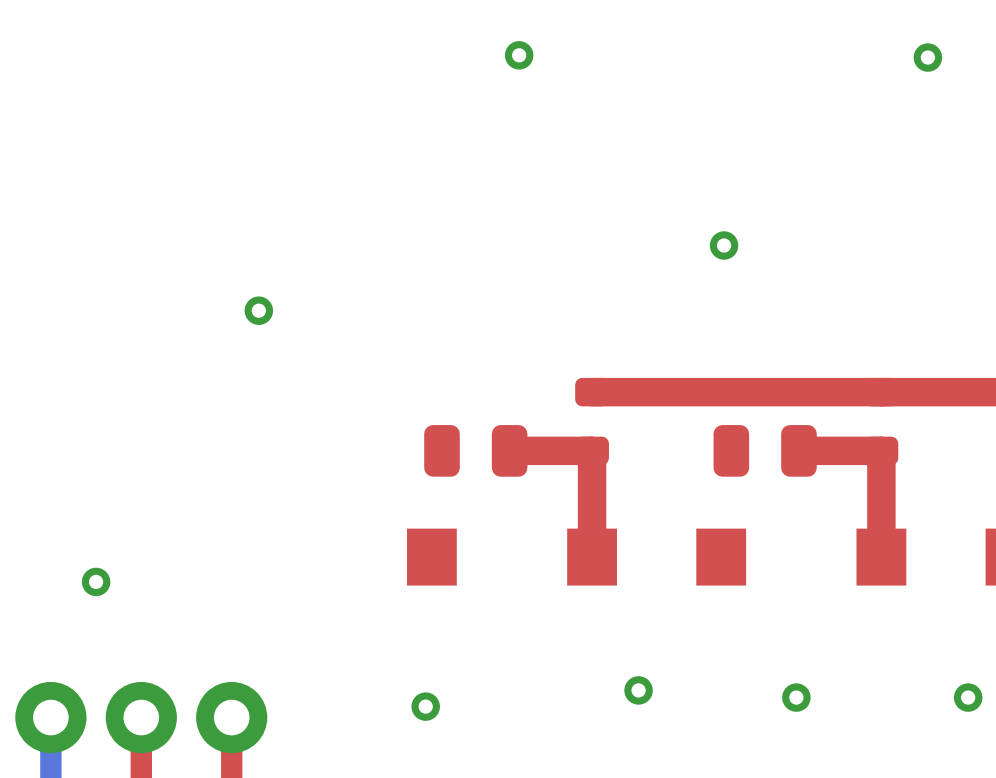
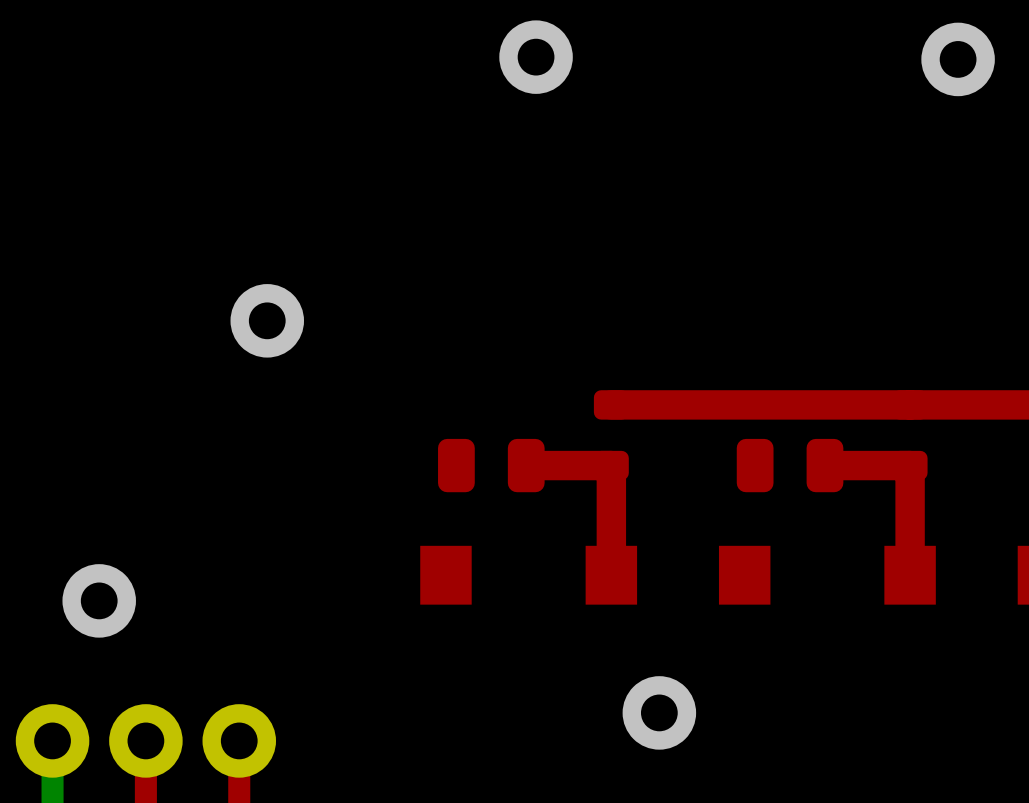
via size: [504, 41, 534, 70] -> [499, 20, 573, 94]
via size: [913, 43, 943, 72] -> [921, 22, 995, 97]
via: (724, 245) -> none
via size: [244, 296, 274, 325] -> [230, 284, 305, 358]
via size: [81, 567, 111, 597] -> [62, 564, 136, 638]
via size: [624, 676, 653, 705] -> [622, 676, 697, 750]
via: (796, 697) -> none
via: (968, 697) -> none
via: (425, 706) -> none

